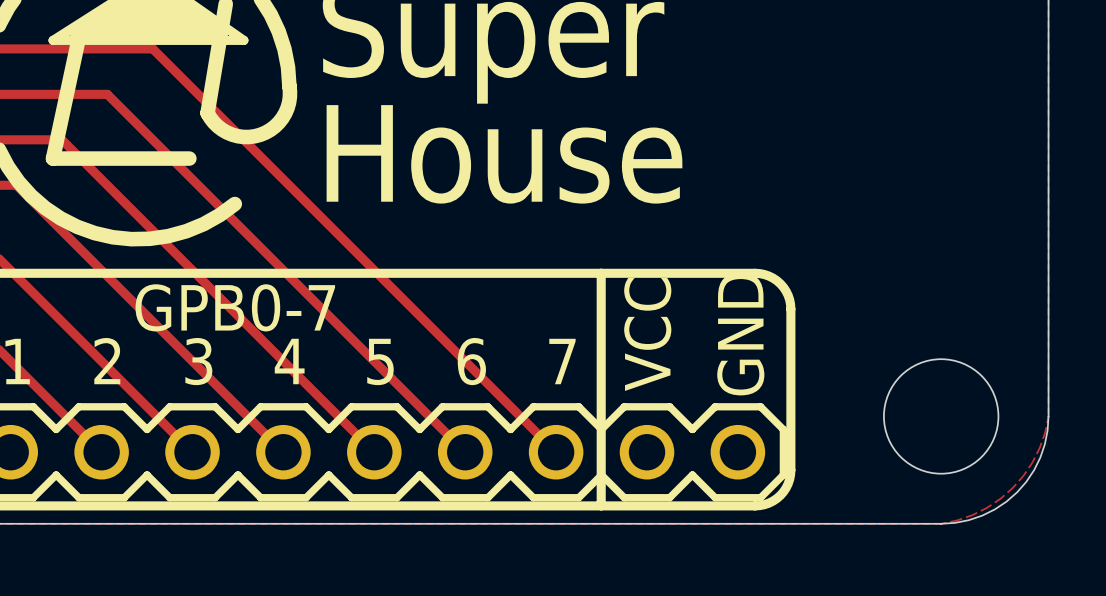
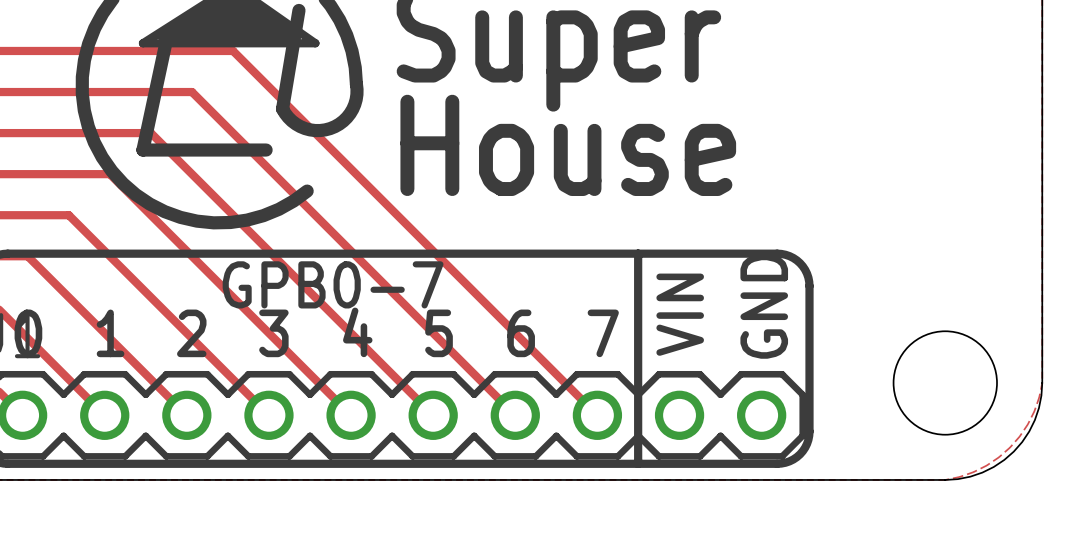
text: VCC (647, 334) -> VIN (680, 314)

